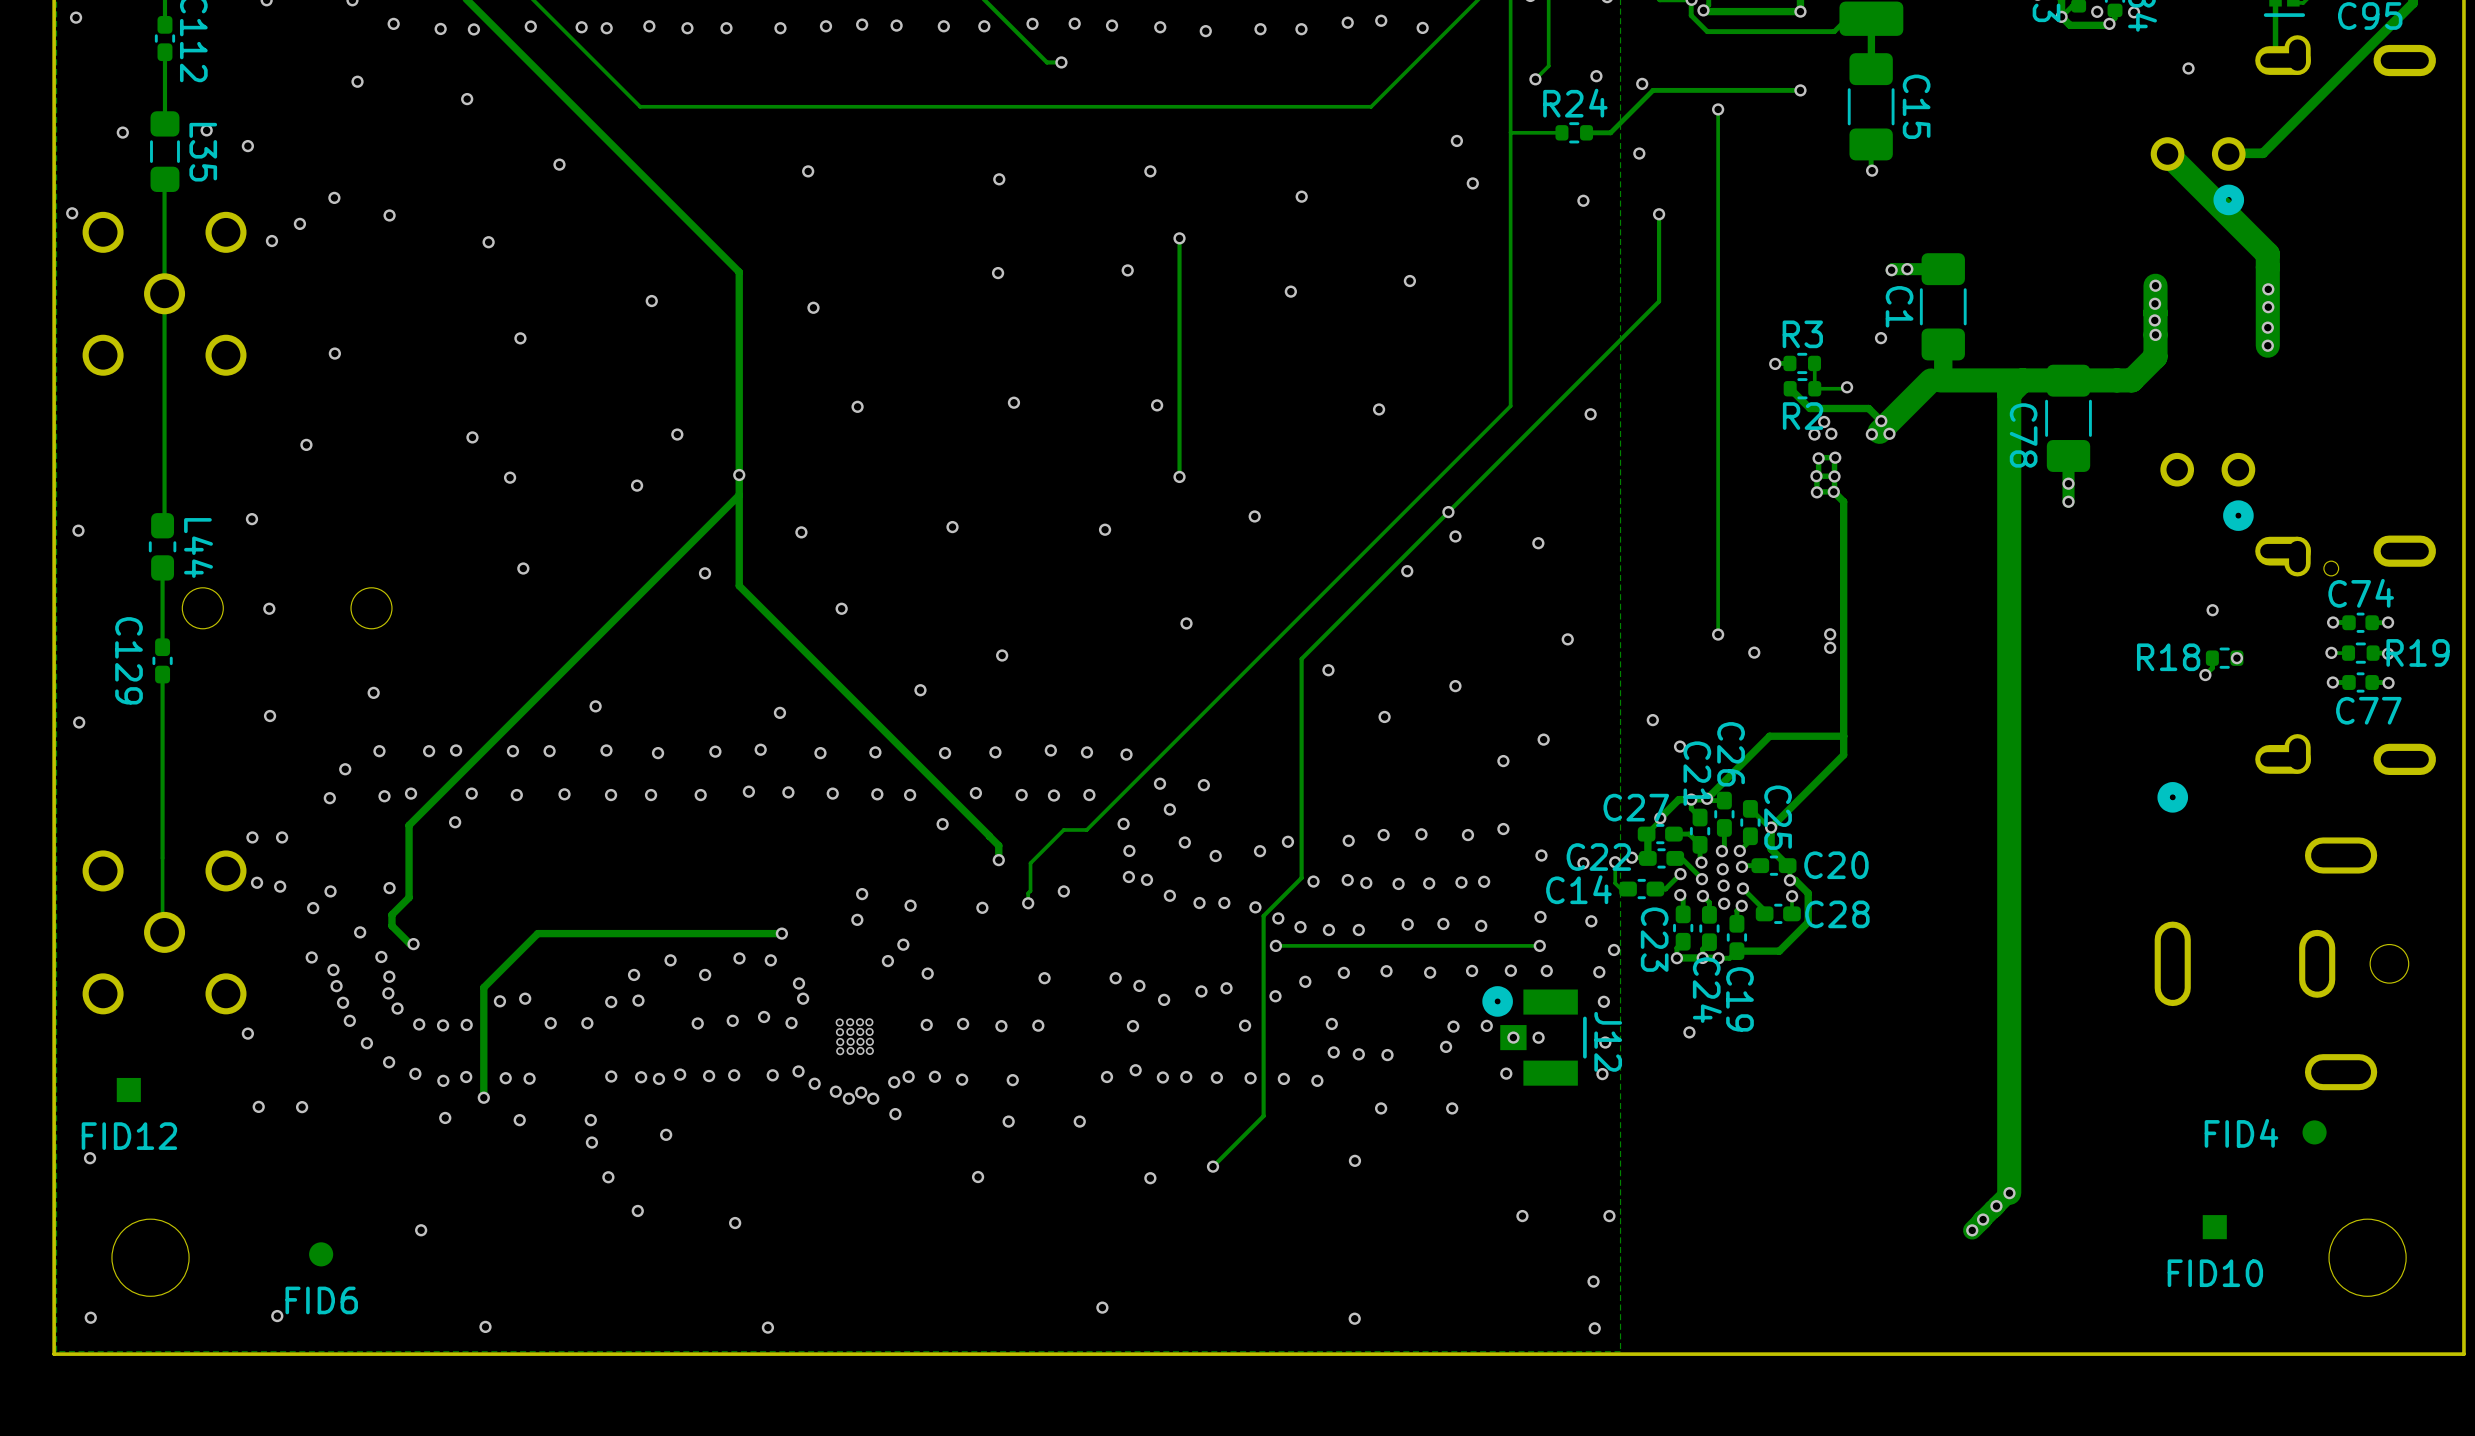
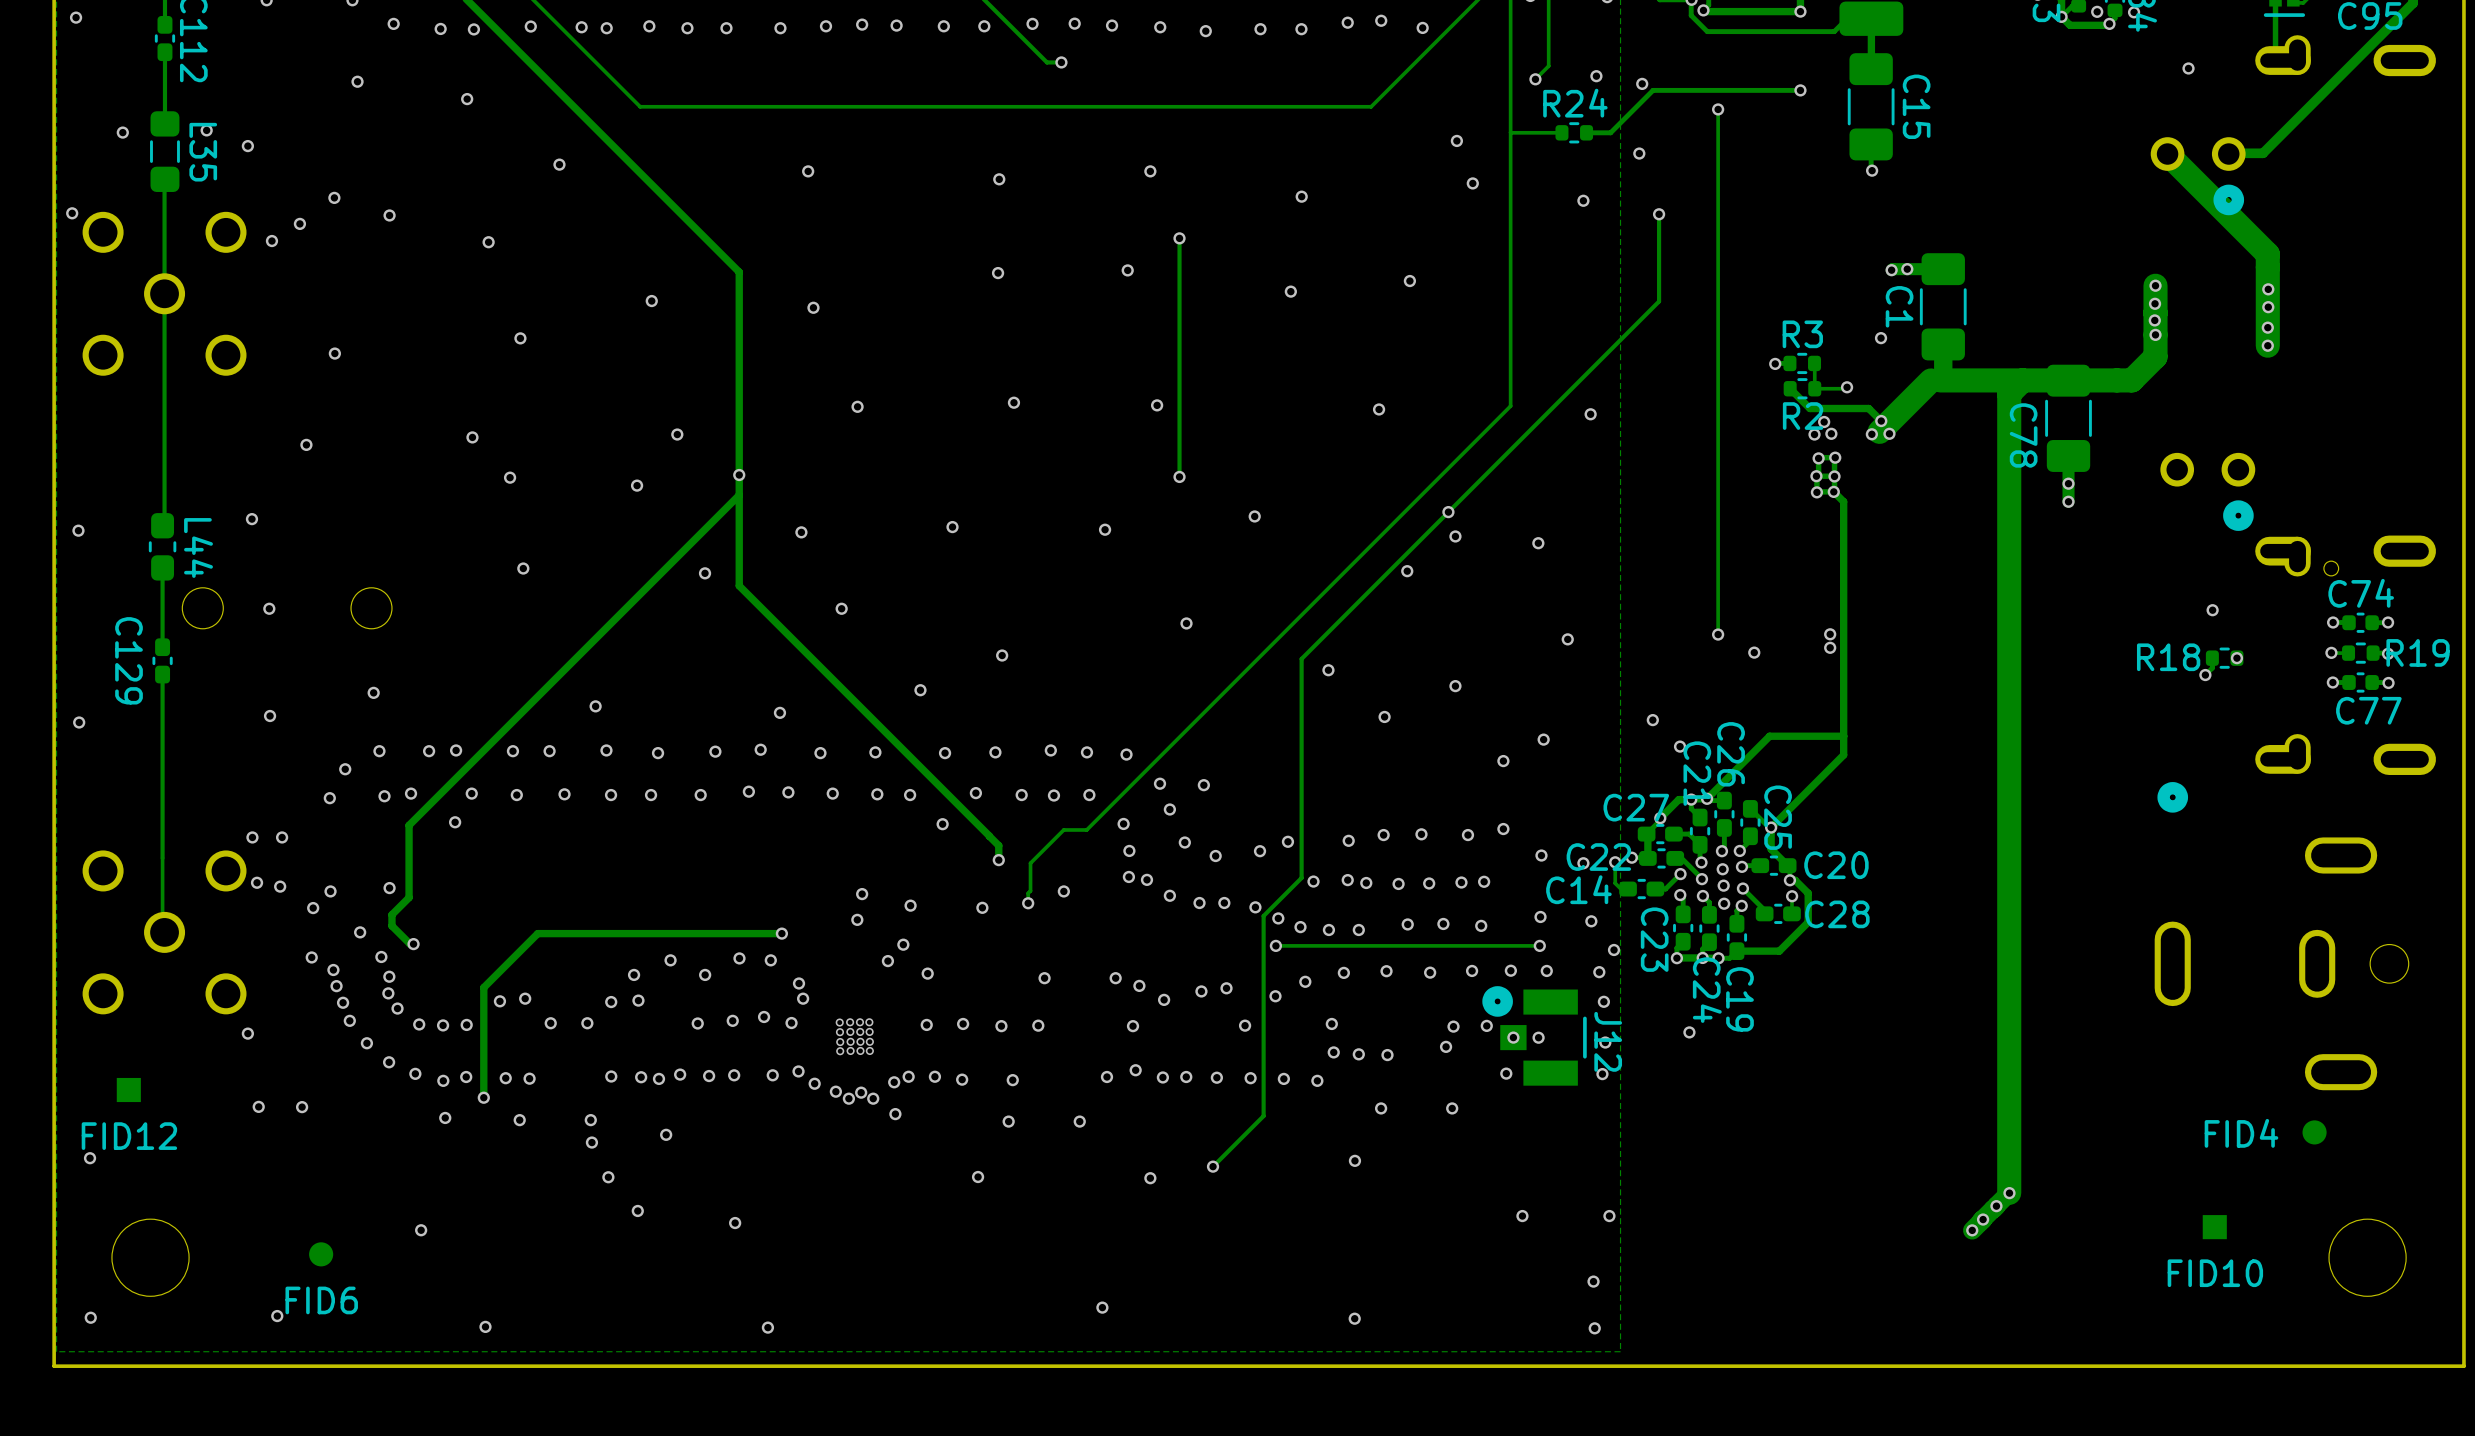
board edge: (2463, 1354) (54, 1354) -> (2463, 1354) (2463, 1366) (54, 1366) (54, 1354)

